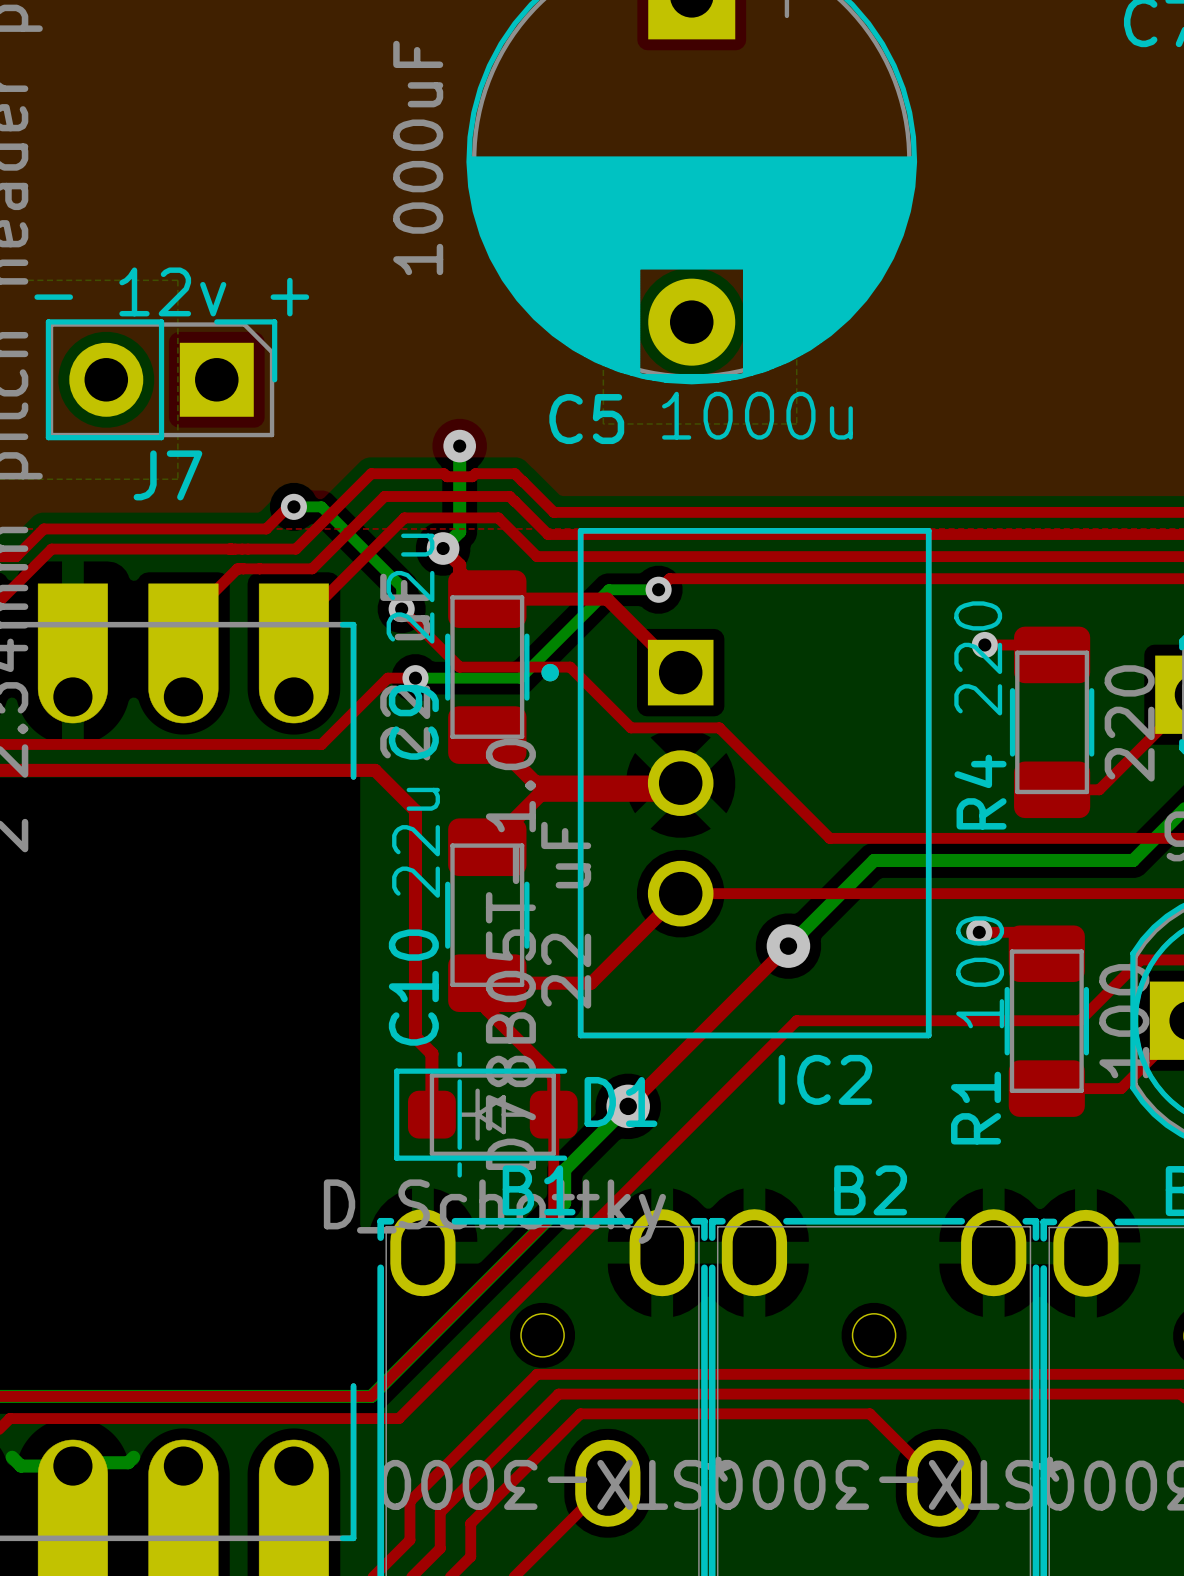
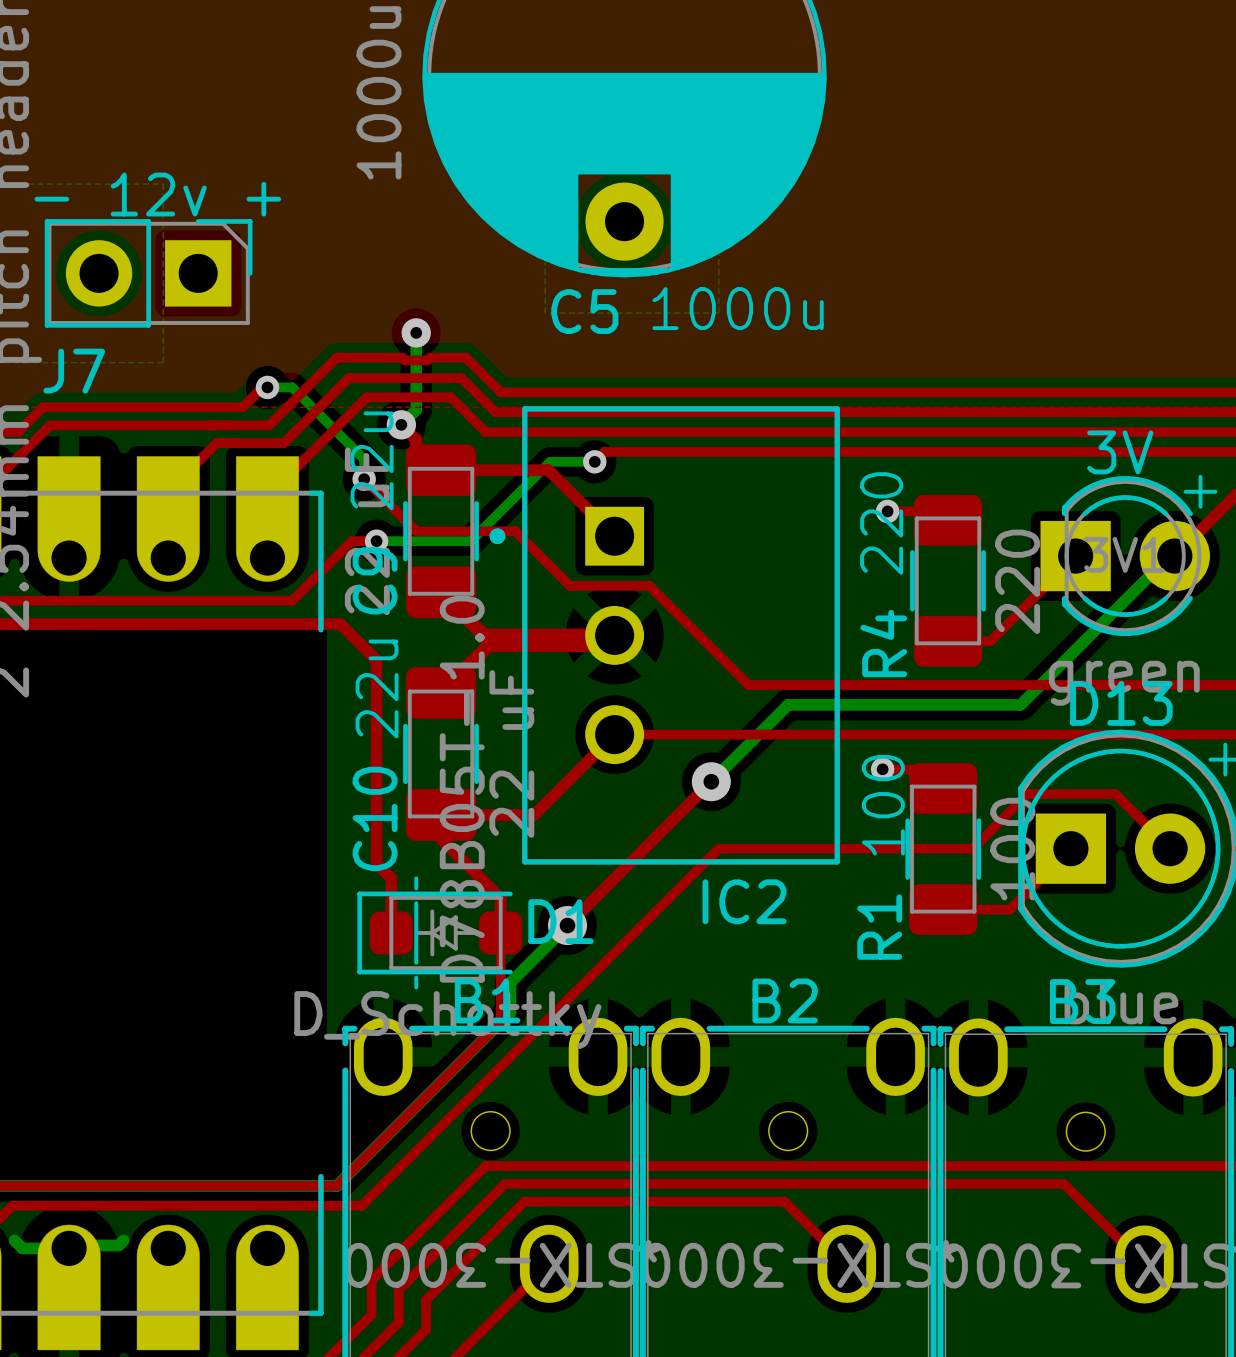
text position: 1000u (757, 415) -> 1000u (738, 308)
C5 name position: C5 (586, 419) -> C5 (584, 311)
J7 name position: J7 (167, 475) -> J7 (74, 371)

